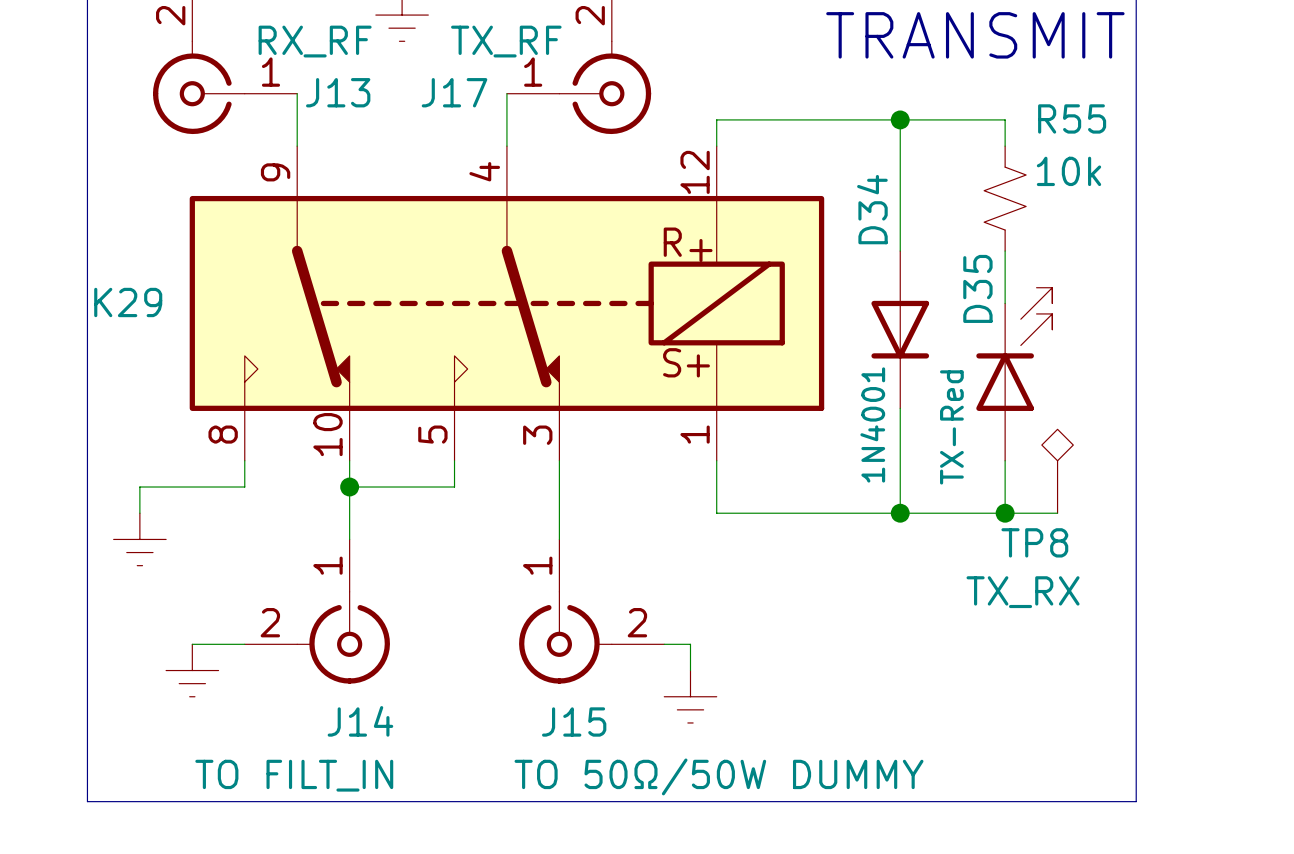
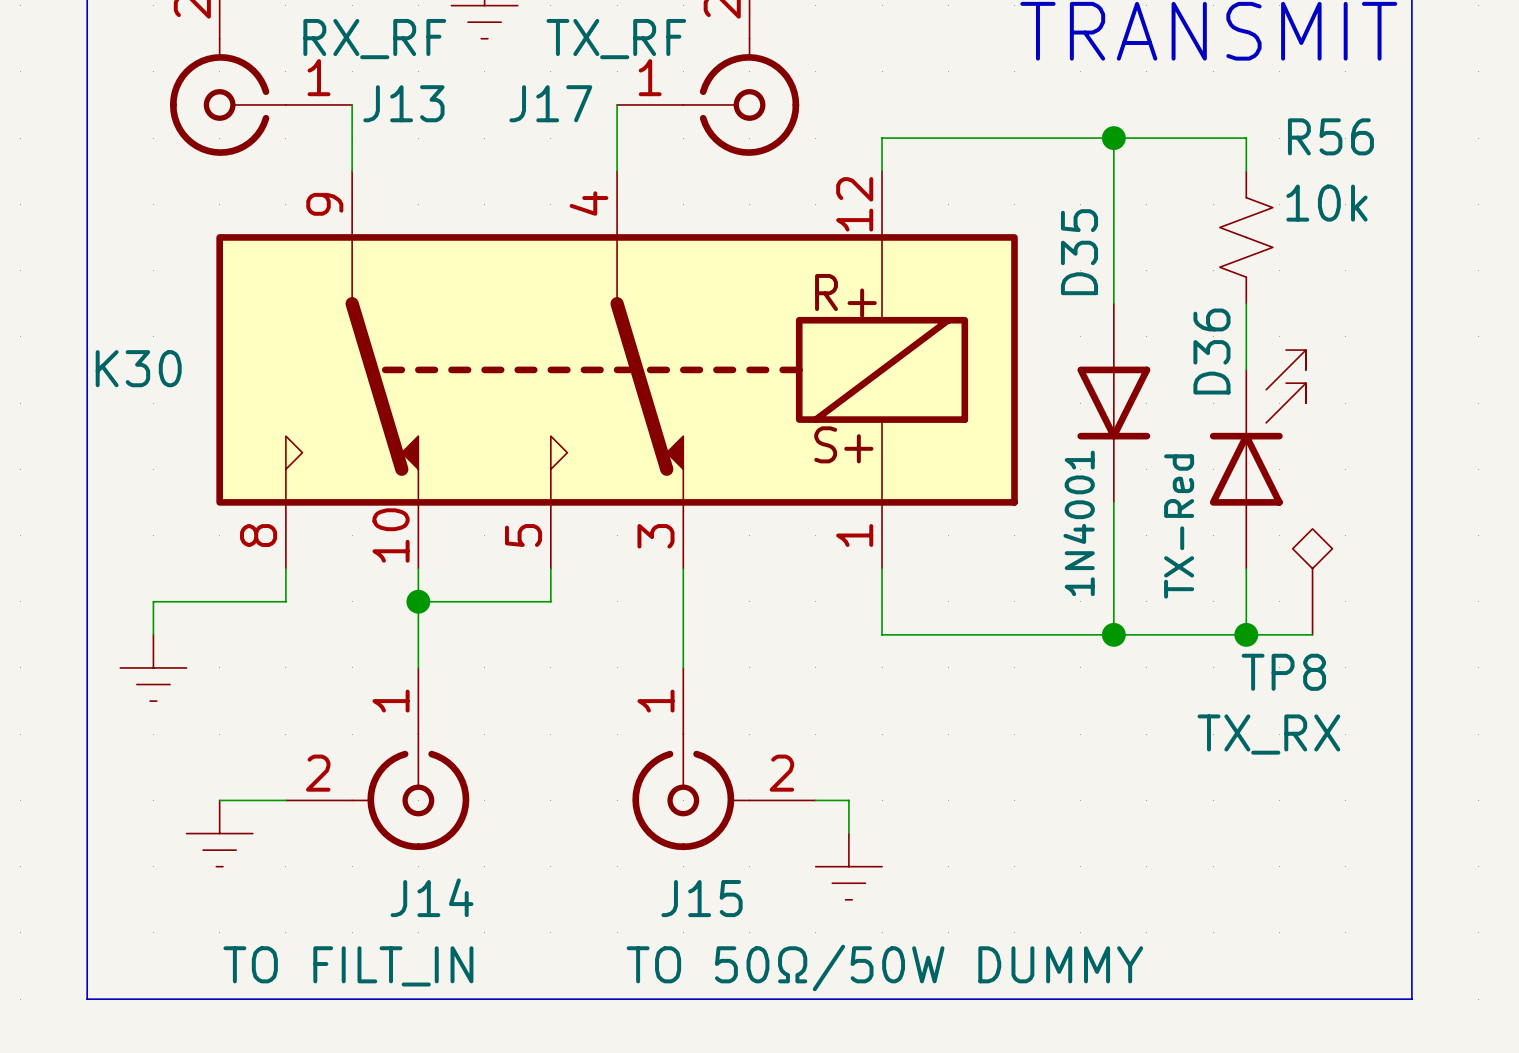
R55 name: R55 (1072, 118) -> R56 (1330, 136)
D34 name: D34 (872, 209) -> D35 (1079, 252)
D35 name: D35 (977, 288) -> D36 (1211, 351)
K29 name: K29 (128, 302) -> K30 (138, 368)

